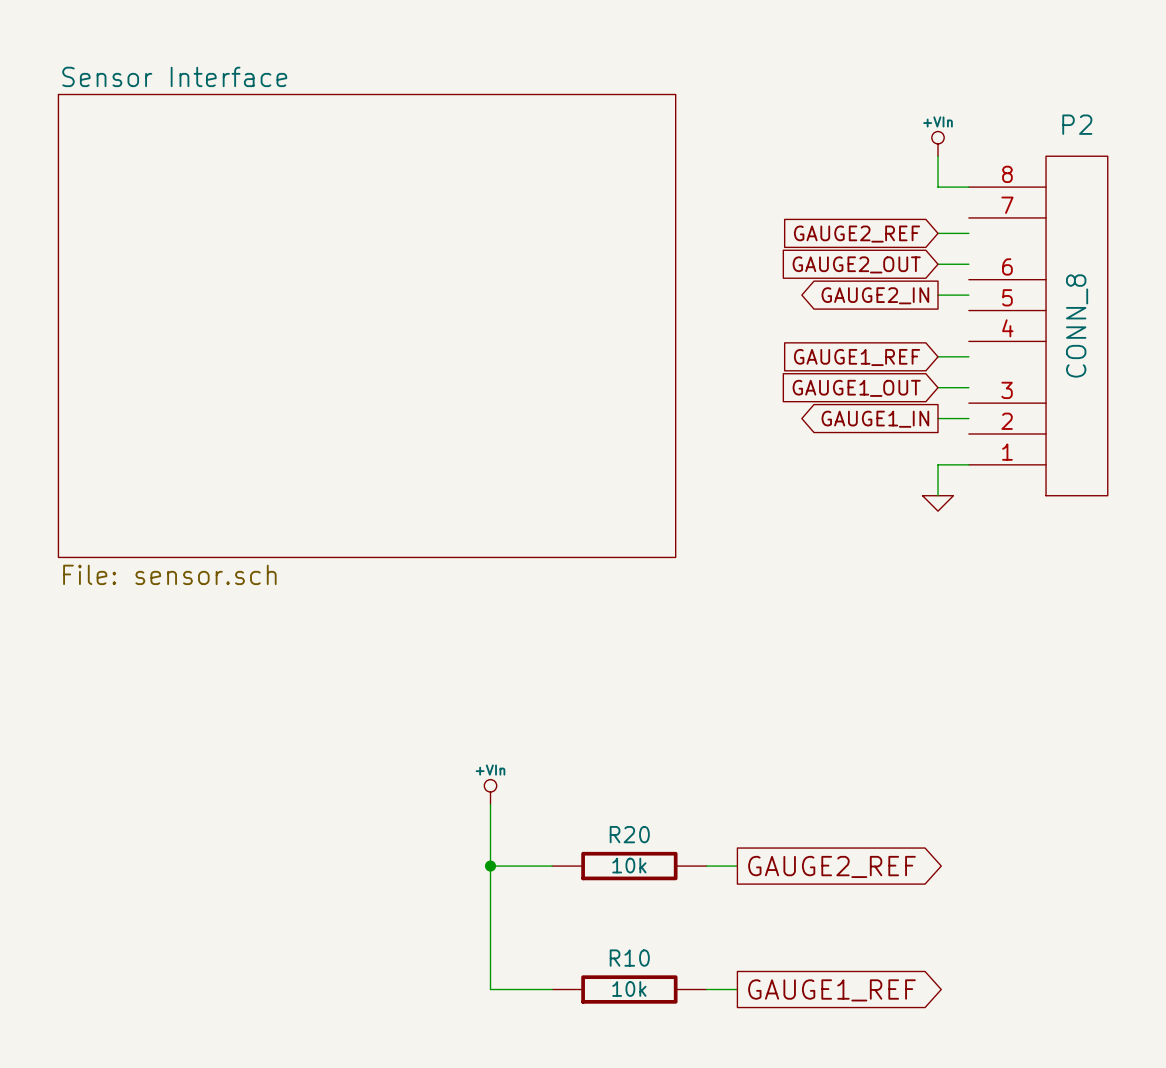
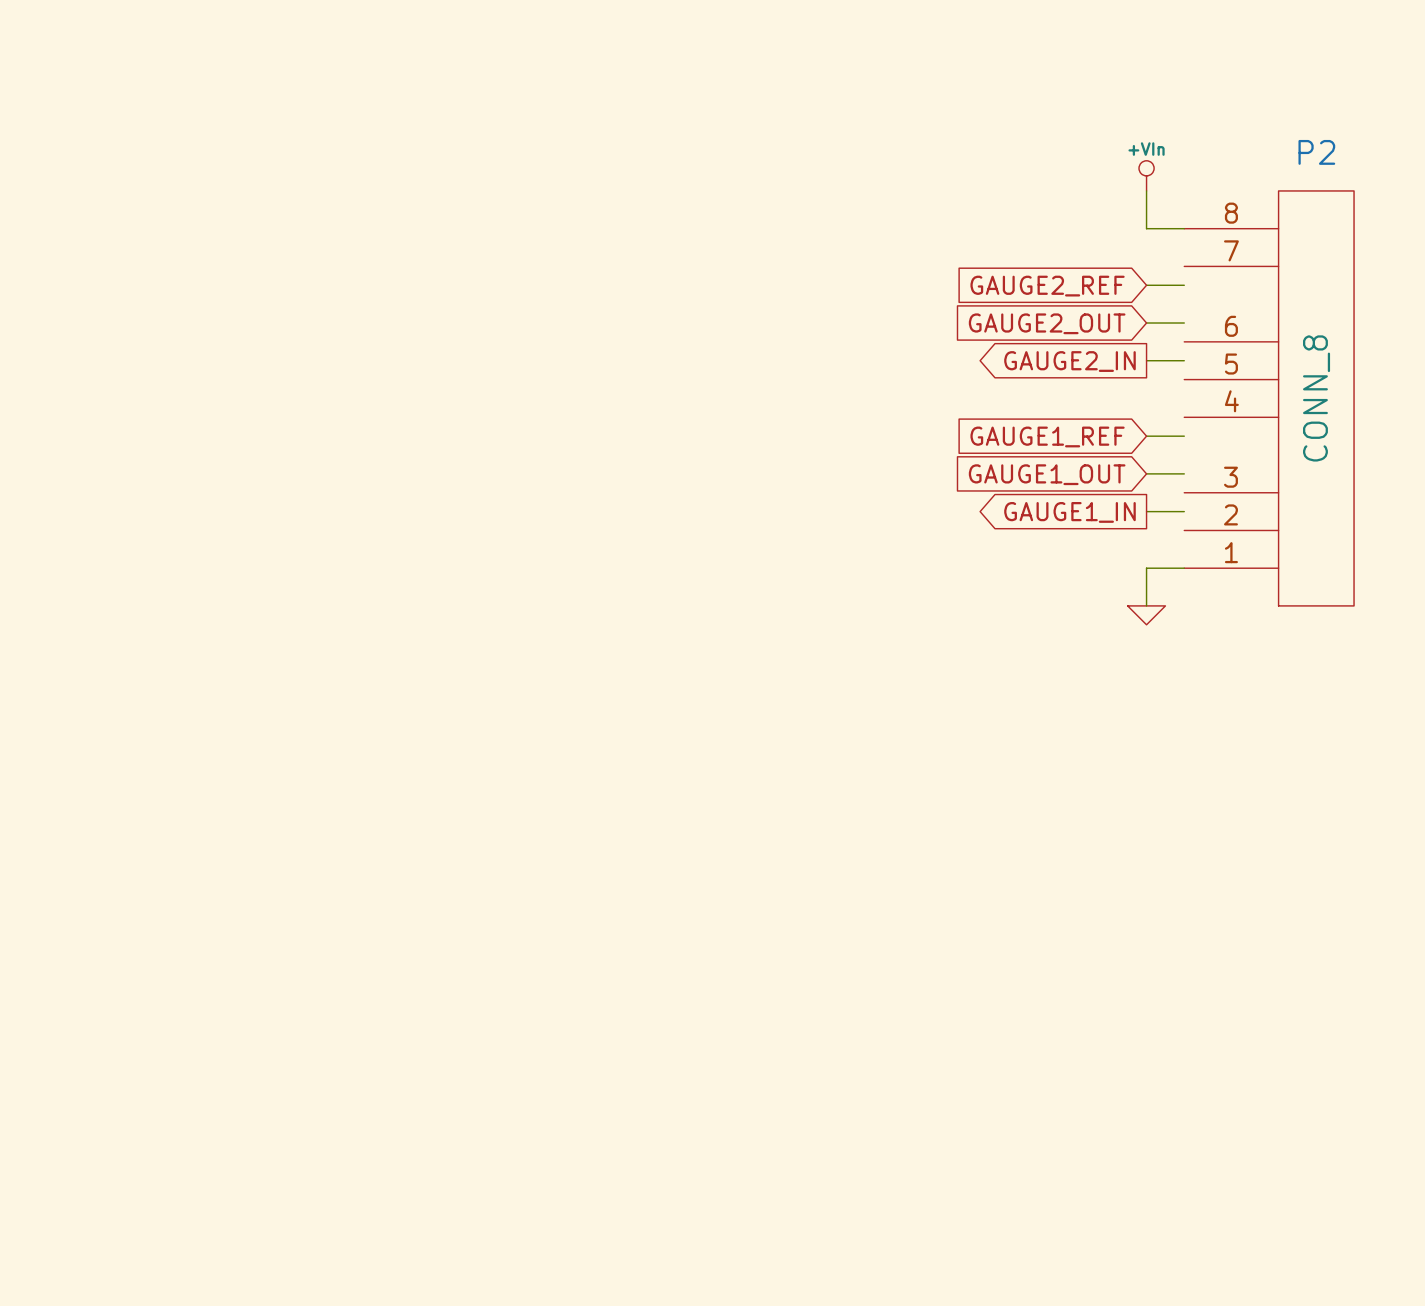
sheet Sensor Interface: File: sensor.sch (367, 325) -> none
power symbol: +VIn (490, 791) -> none
wire: (490, 804) (490, 989) (552, 989) -> none
wire: (490, 866) (552, 866) -> none
junction: (490, 866) -> none
R20: 10k (629, 866) -> none
wire: (706, 866) (737, 866) -> none
global label: GAUGE2_REF (831, 866) -> none
R10: 10k (629, 989) -> none
wire: (706, 989) (737, 989) -> none
global label: GAUGE1_REF (831, 990) -> none

